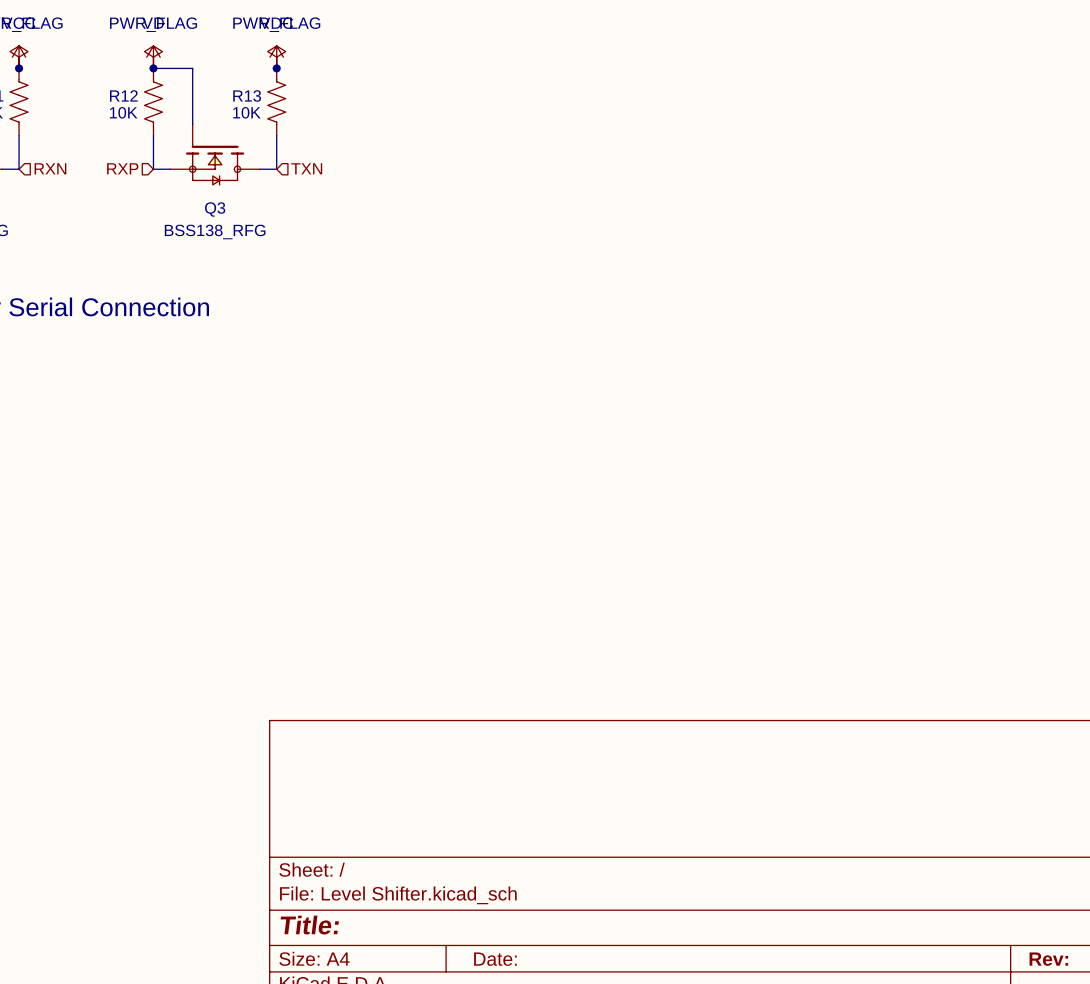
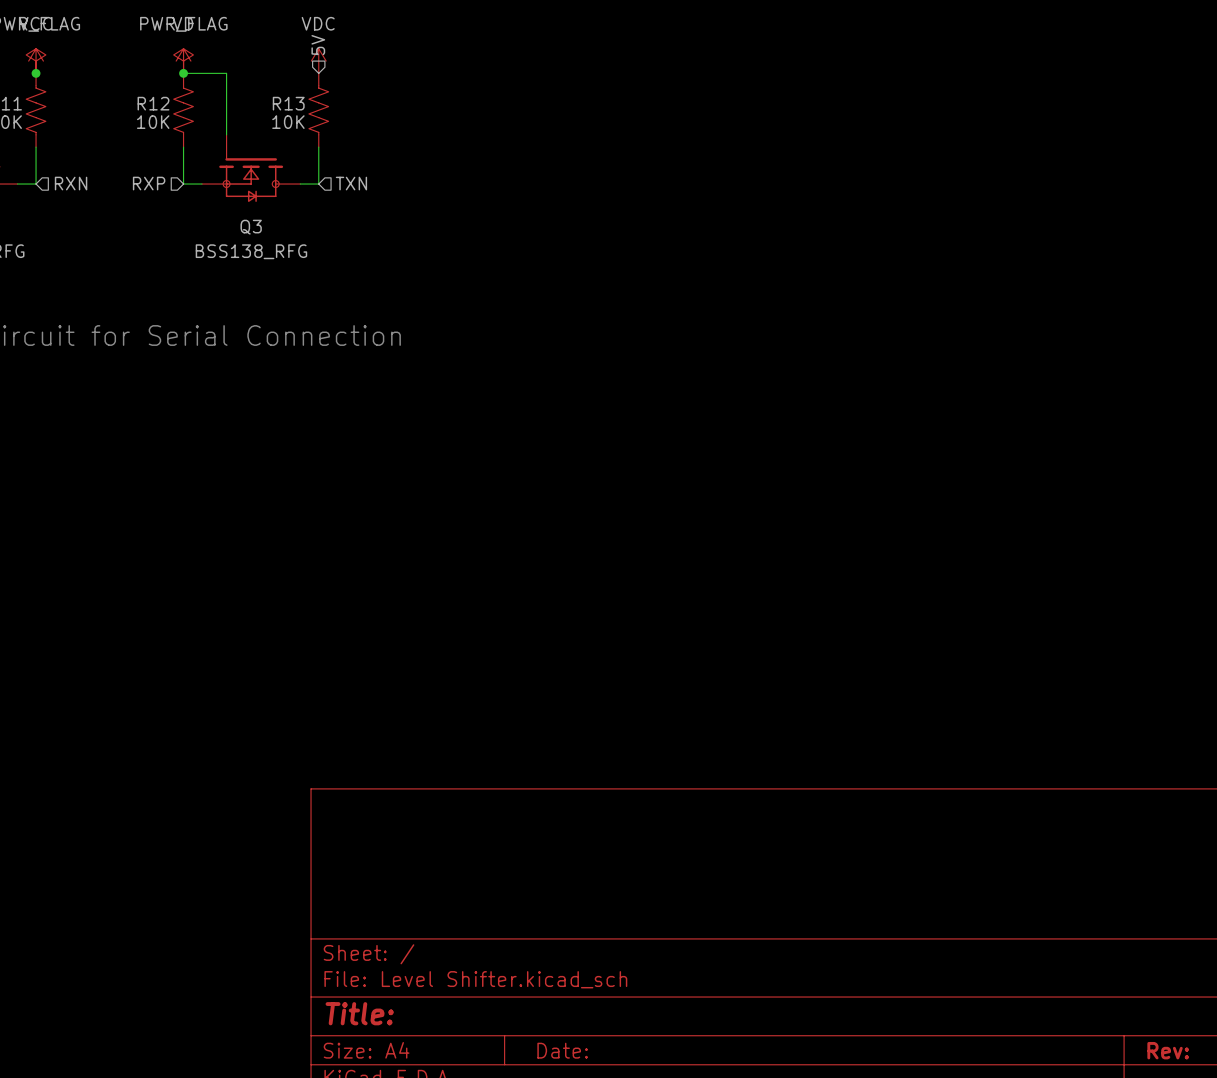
hierarchical label: none -> 5V (318, 45)
power symbol: PWR_FLAG (276, 57) -> none
junction: (276, 68) -> none

